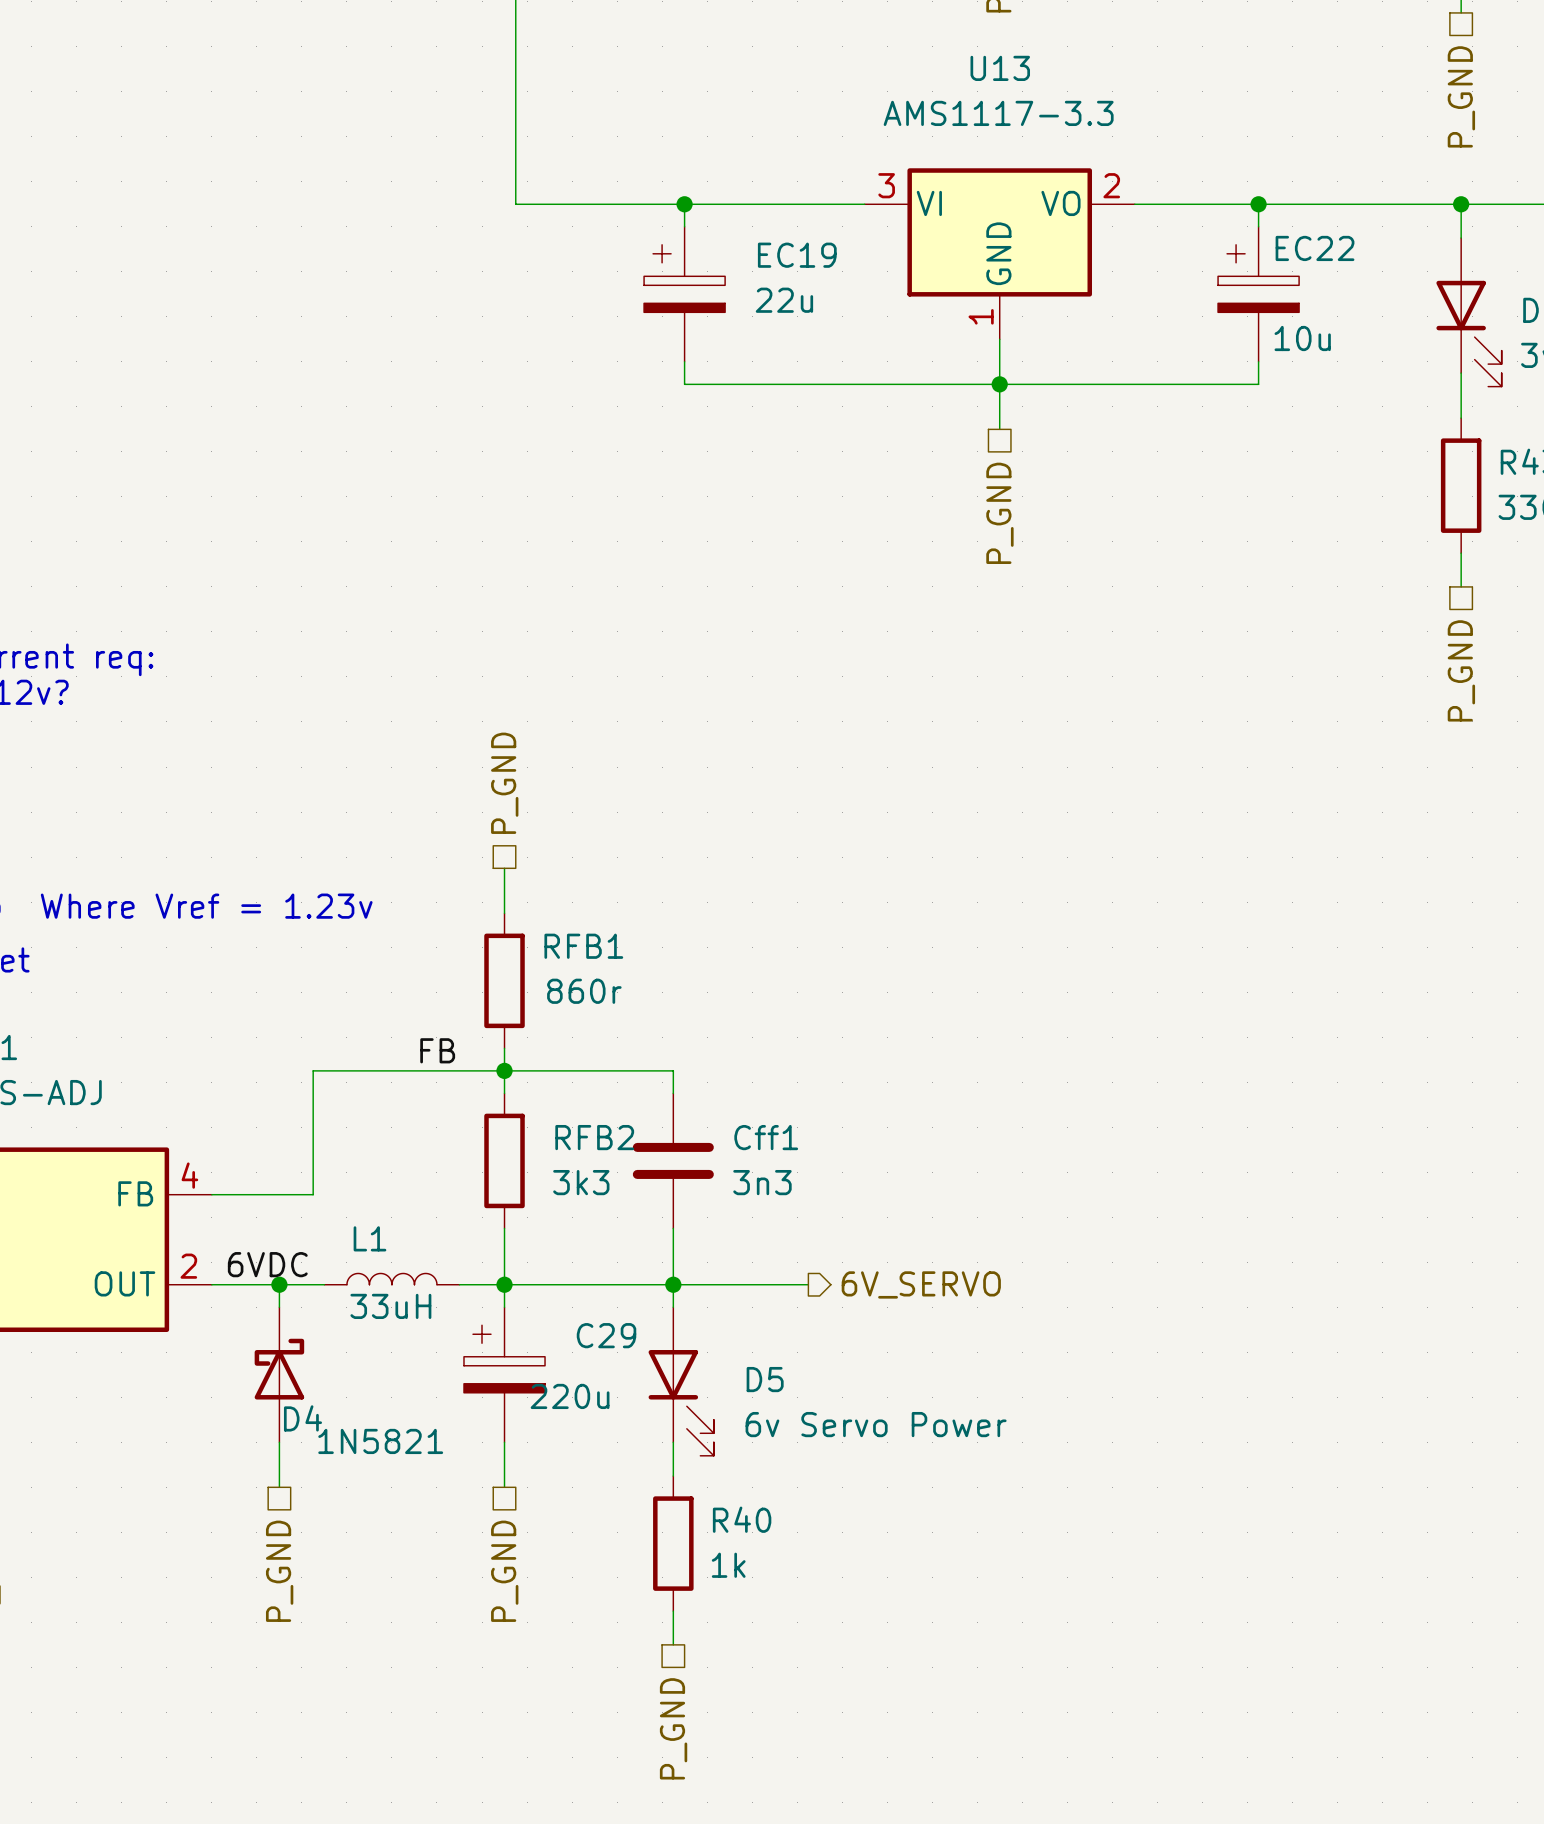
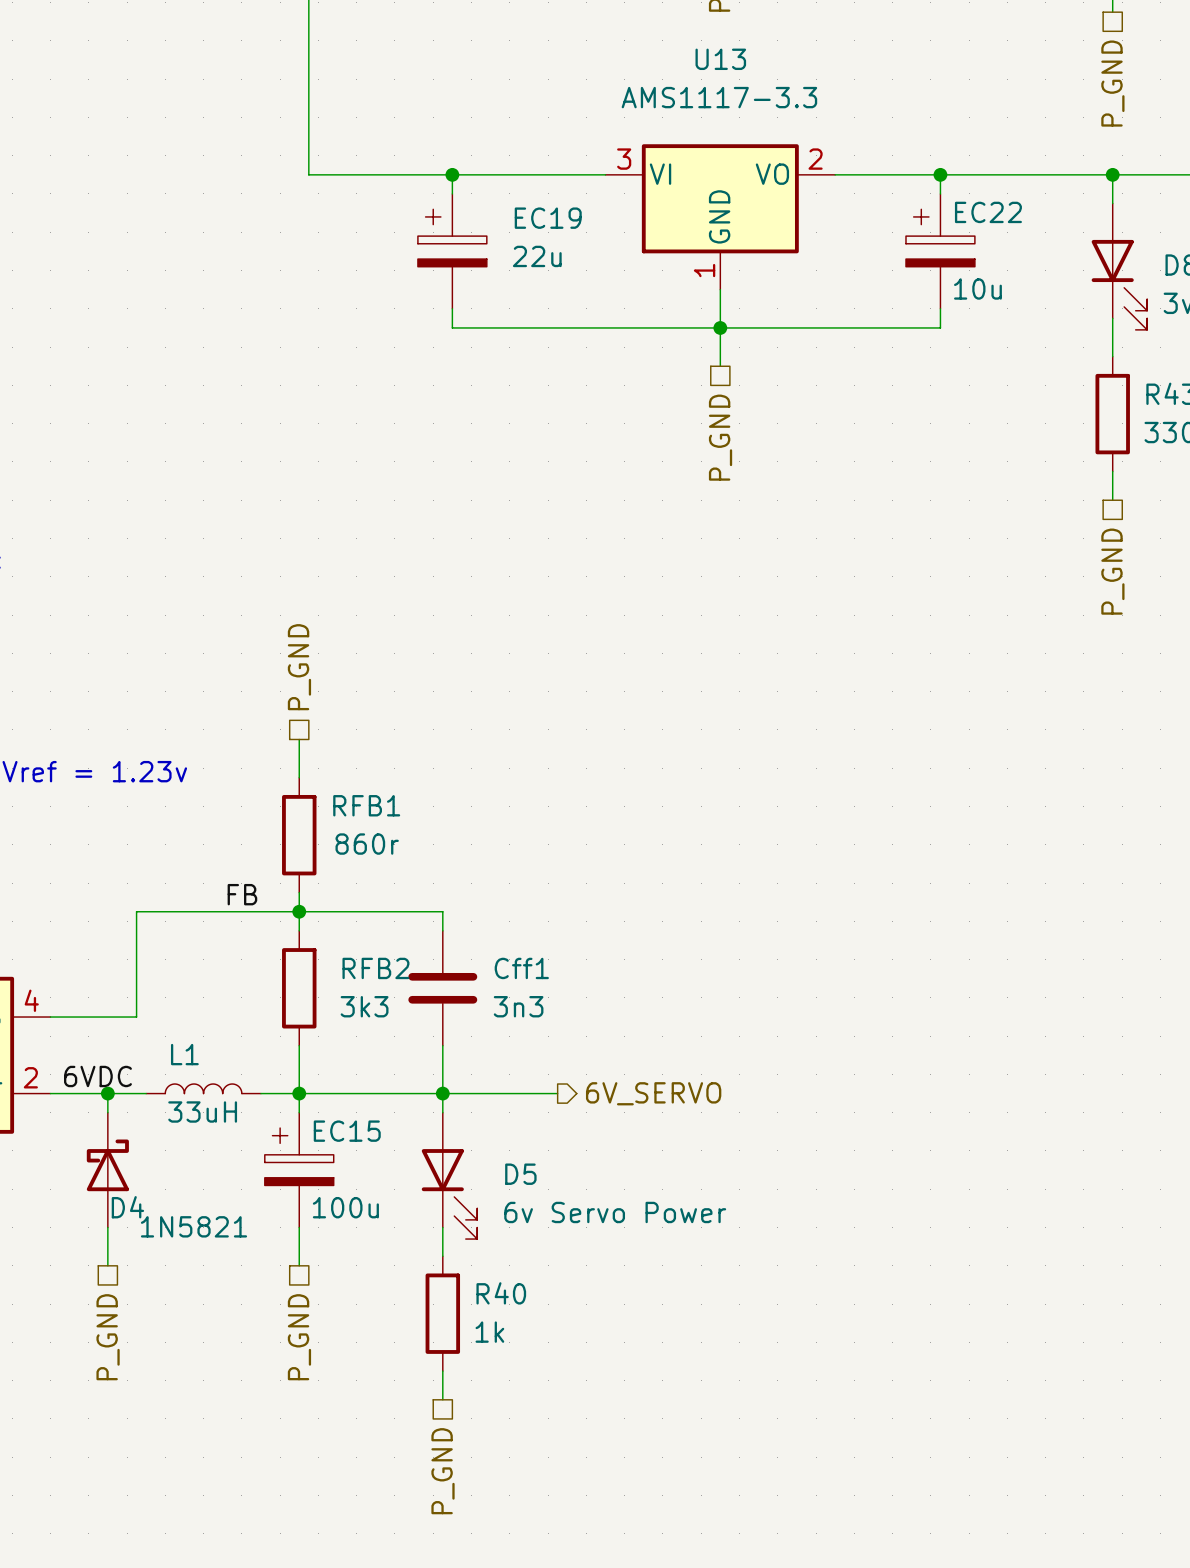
C29 name: C29 (606, 1335) -> EC15 (347, 1131)
C29 value: 220u (570, 1396) -> 100u (345, 1207)

